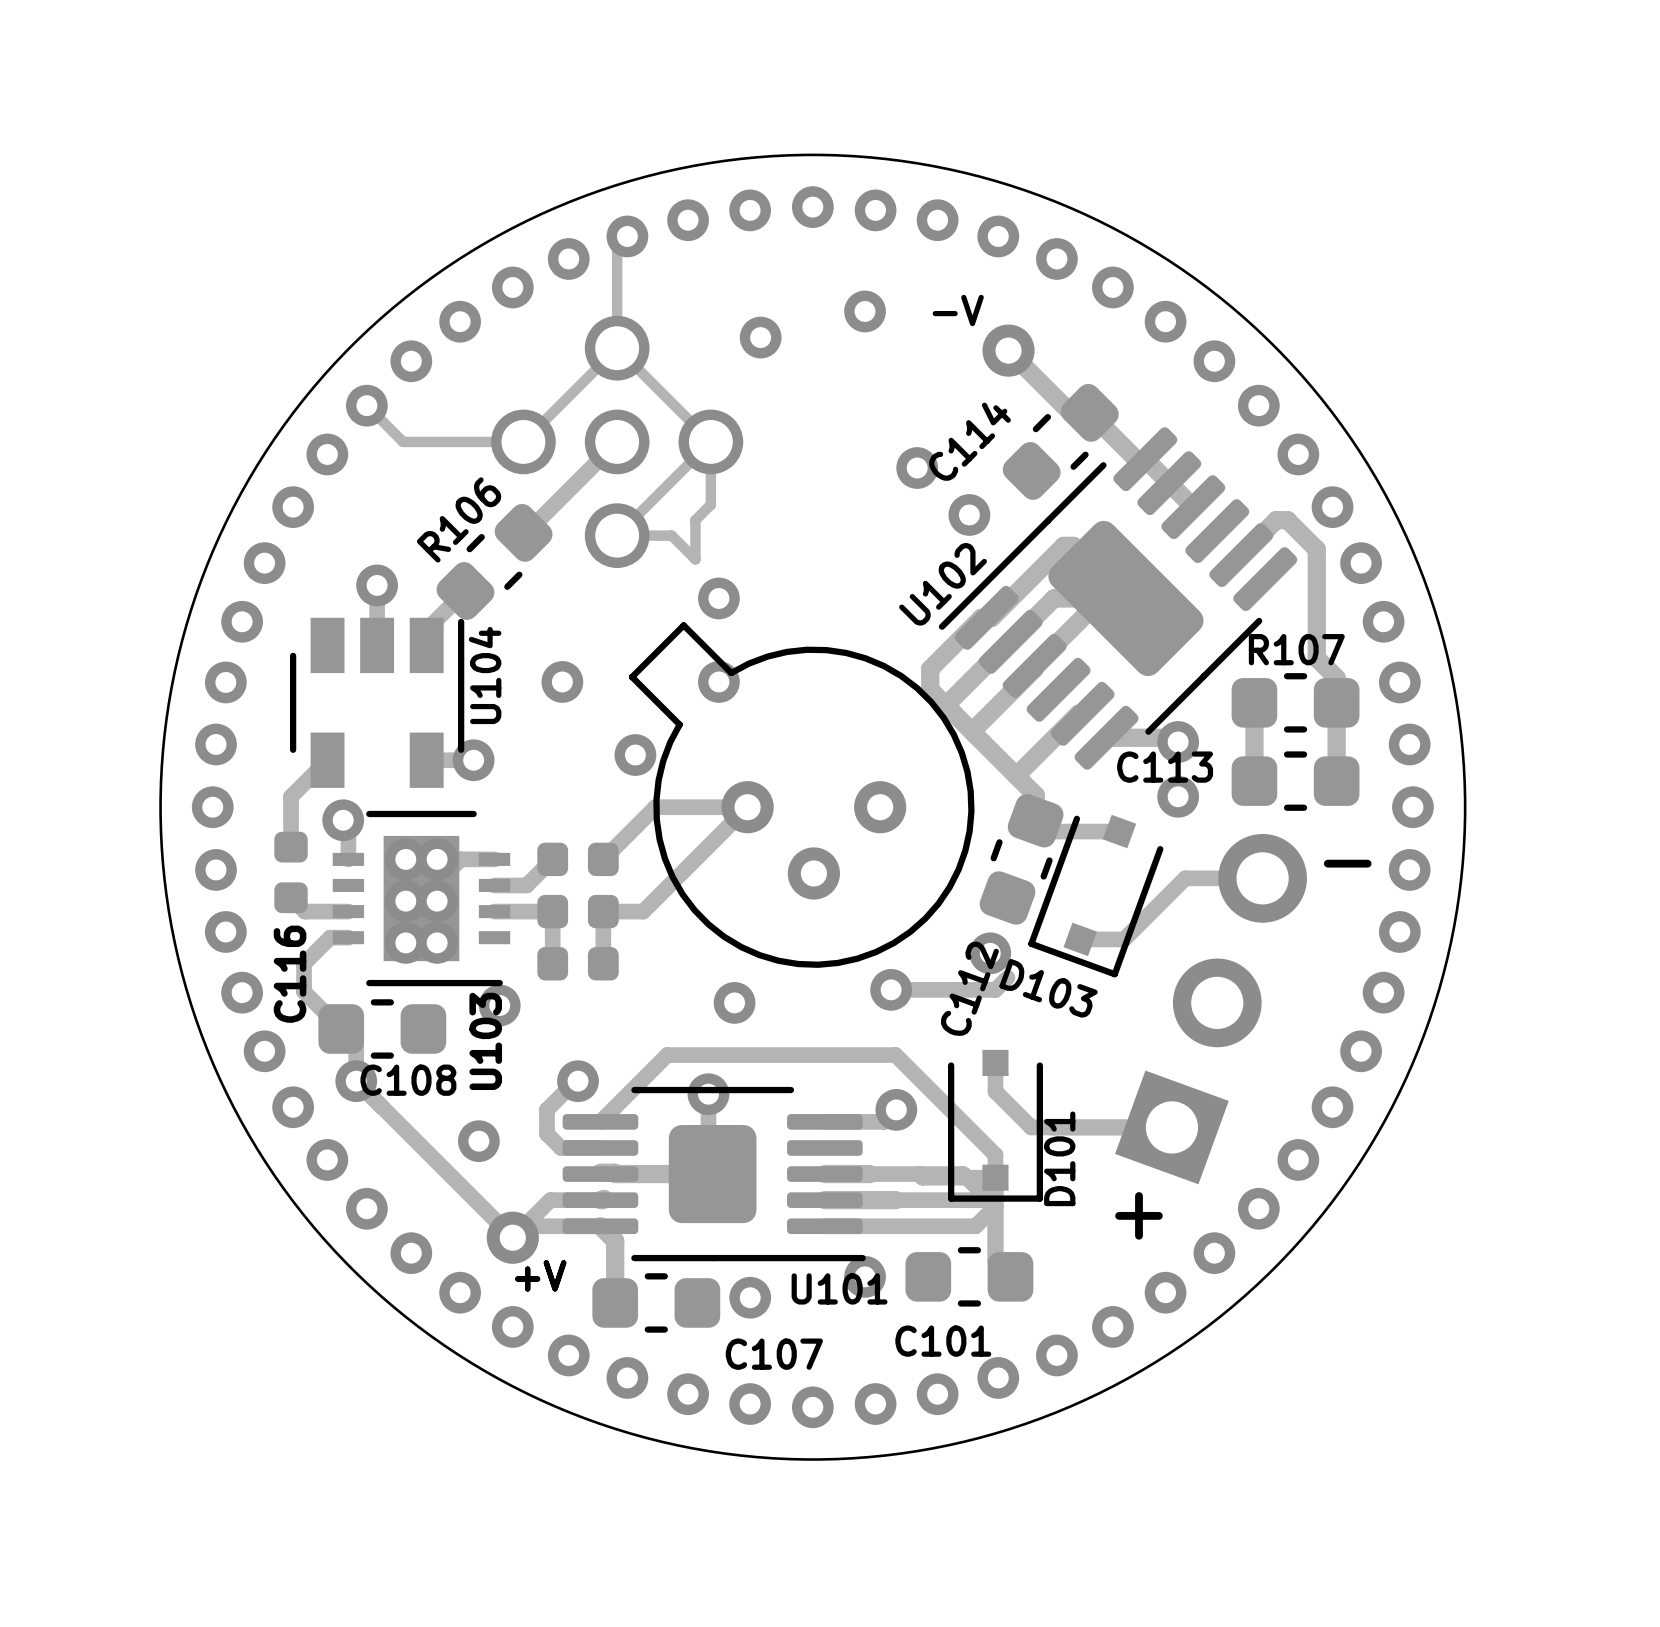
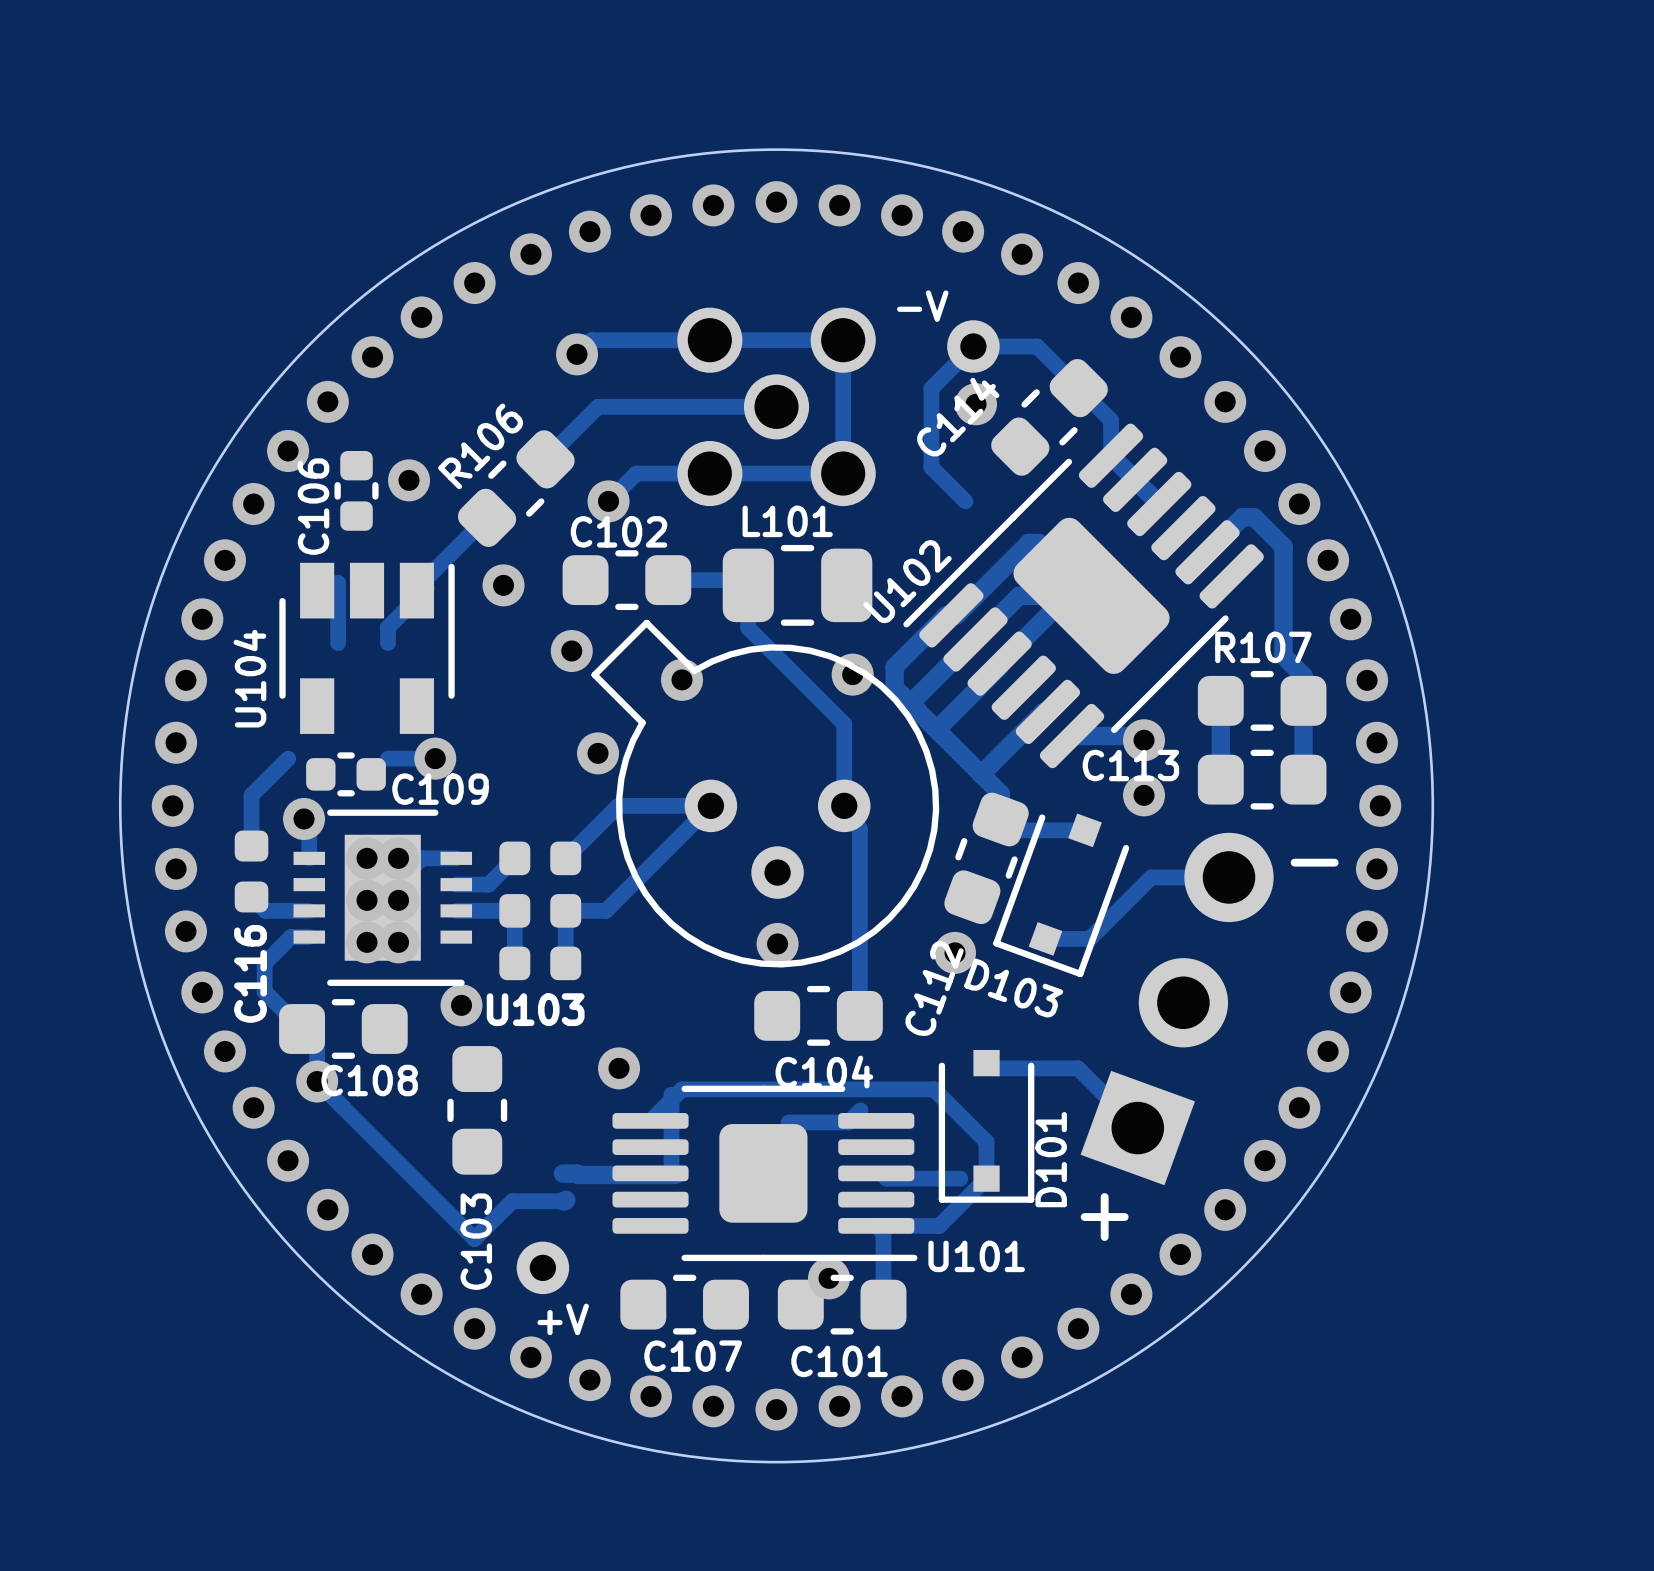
track: (627, 236) (617, 246) (617, 348) -> none
via: (865, 311) -> none
via: (760, 337) -> none
track: (617, 348) (710, 441) -> none
track: (617, 348) (523, 441) (403, 441) (366, 405) -> none
track: (1008, 350) (1070, 412) (1089, 412) (1136, 459) (1145, 459) -> (965, 501) (931, 467) (931, 388) (973, 346) (1037, 346) (1111, 420) (1111, 455)
track: none -> (577, 354) (591, 340) (843, 340) (843, 473) (636, 473) (608, 501)
via: none -> (577, 354)
via: none -> (976, 404)
track: none -> (776, 406) (598, 406) (545, 459)
part: none -> (776, 406)
track: (617, 441) (526, 532) -> none
part: (617, 441) -> none
track: (710, 441) (710, 504) (695, 520) (695, 559) (671, 535) (617, 535) -> none
track: (710, 441) (617, 535) -> none
C114 position: (1060, 441) -> (1049, 417)
via: (917, 468) -> none
via: none -> (409, 480)
C106: none -> (356, 490)
via: none -> (608, 501)
via: (969, 514) -> none
track: none -> (487, 517) (416, 588) (416, 590)
R106 position: (494, 561) -> (516, 488)
C102: none -> (626, 580)
track: none -> (668, 580) (743, 580) (748, 585) (748, 628) (844, 723) (844, 813) (859, 828) (859, 1015)
via: (377, 585) -> none
via: none -> (503, 585)
L101: none -> (797, 585)
via: (718, 598) -> none
via: none -> (571, 651)
U104 name position: U104 (485, 675) -> U104 (249, 678)
via: none -> (852, 674)
via: (562, 681) -> none
U104 position: (377, 702) -> (367, 648)
C109: none -> (346, 774)
via: none -> (777, 943)
track: (1007, 977) (995, 989) (891, 989) -> none
via: (891, 989) -> none
via: (734, 1002) -> none
C104: none -> (818, 1015)
U103 name rotation: 0° (485, 1041) -> 90° clockwise (535, 1009)
track: (995, 1062) (995, 1091) (1031, 1127) (1171, 1127) -> (986, 1063) (991, 1068) (1078, 1068) (1137, 1128)
via: none -> (619, 1068)
track: (578, 1081) (575, 1081) (546, 1109) (546, 1133) (561, 1147) (600, 1147) -> none
via: (578, 1081) -> none
via: (708, 1094) -> none
C103: none -> (477, 1110)
via: (896, 1109) -> none
track: none -> (650, 1120) (682, 1089) (934, 1089) (986, 1141) (986, 1178) (939, 1225) (876, 1225) (883, 1233) (883, 1304)
track: (600, 1121) (667, 1055) (895, 1055) (995, 1154) (995, 1261) (1010, 1276) -> none
D101 position: (995, 1125) -> (986, 1126)
via: (478, 1141) -> none
U101 position: (714, 1174) -> (764, 1173)
track: (869, 1174) (824, 1174) (963, 1174) (995, 1206) (975, 1226) (824, 1226) -> none
track: (895, 1200) (824, 1200) (989, 1200) -> none
track: (524, 1226) (600, 1226) (615, 1240) (615, 1302) -> none
part position: (512, 1237) -> (542, 1267)
text position: +V (540, 1275) -> +V (563, 1319)
C101 position: (969, 1276) -> (842, 1304)
U101 name position: U101 (839, 1288) -> U101 (976, 1256)
via: (750, 1297) -> none
C107 position: (656, 1302) -> (684, 1304)
C101 name position: C101 (943, 1341) -> C101 (839, 1361)
C107 name position: C107 (774, 1354) -> C107 (693, 1356)

